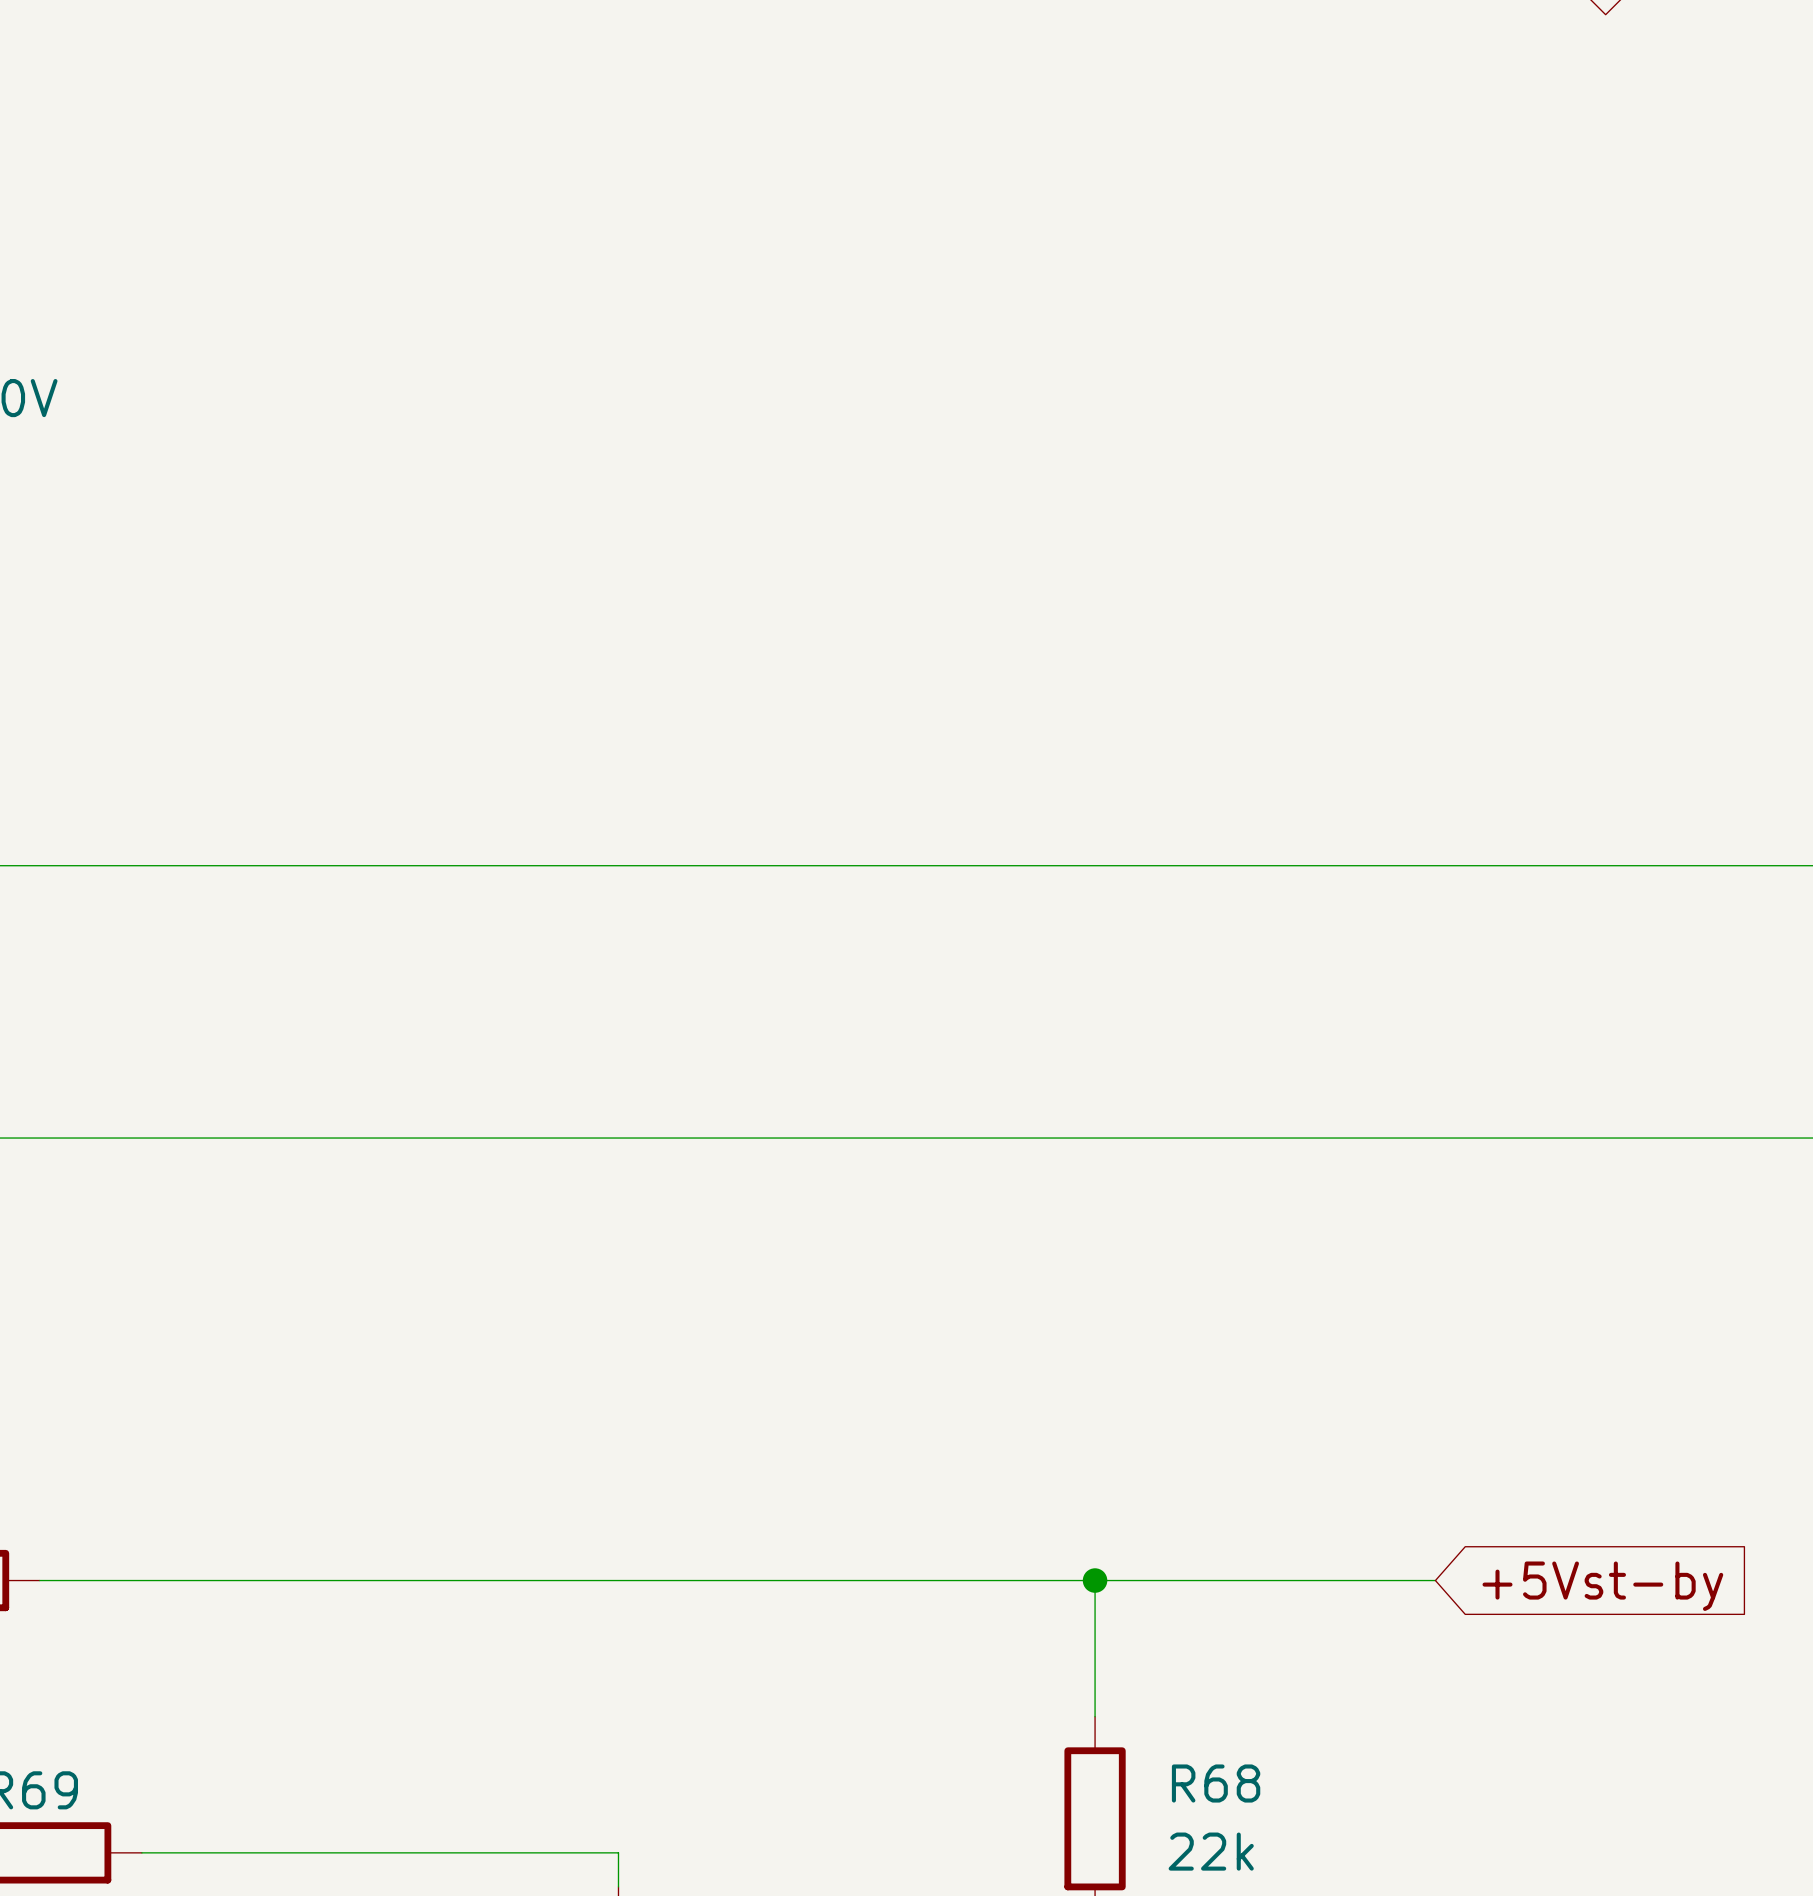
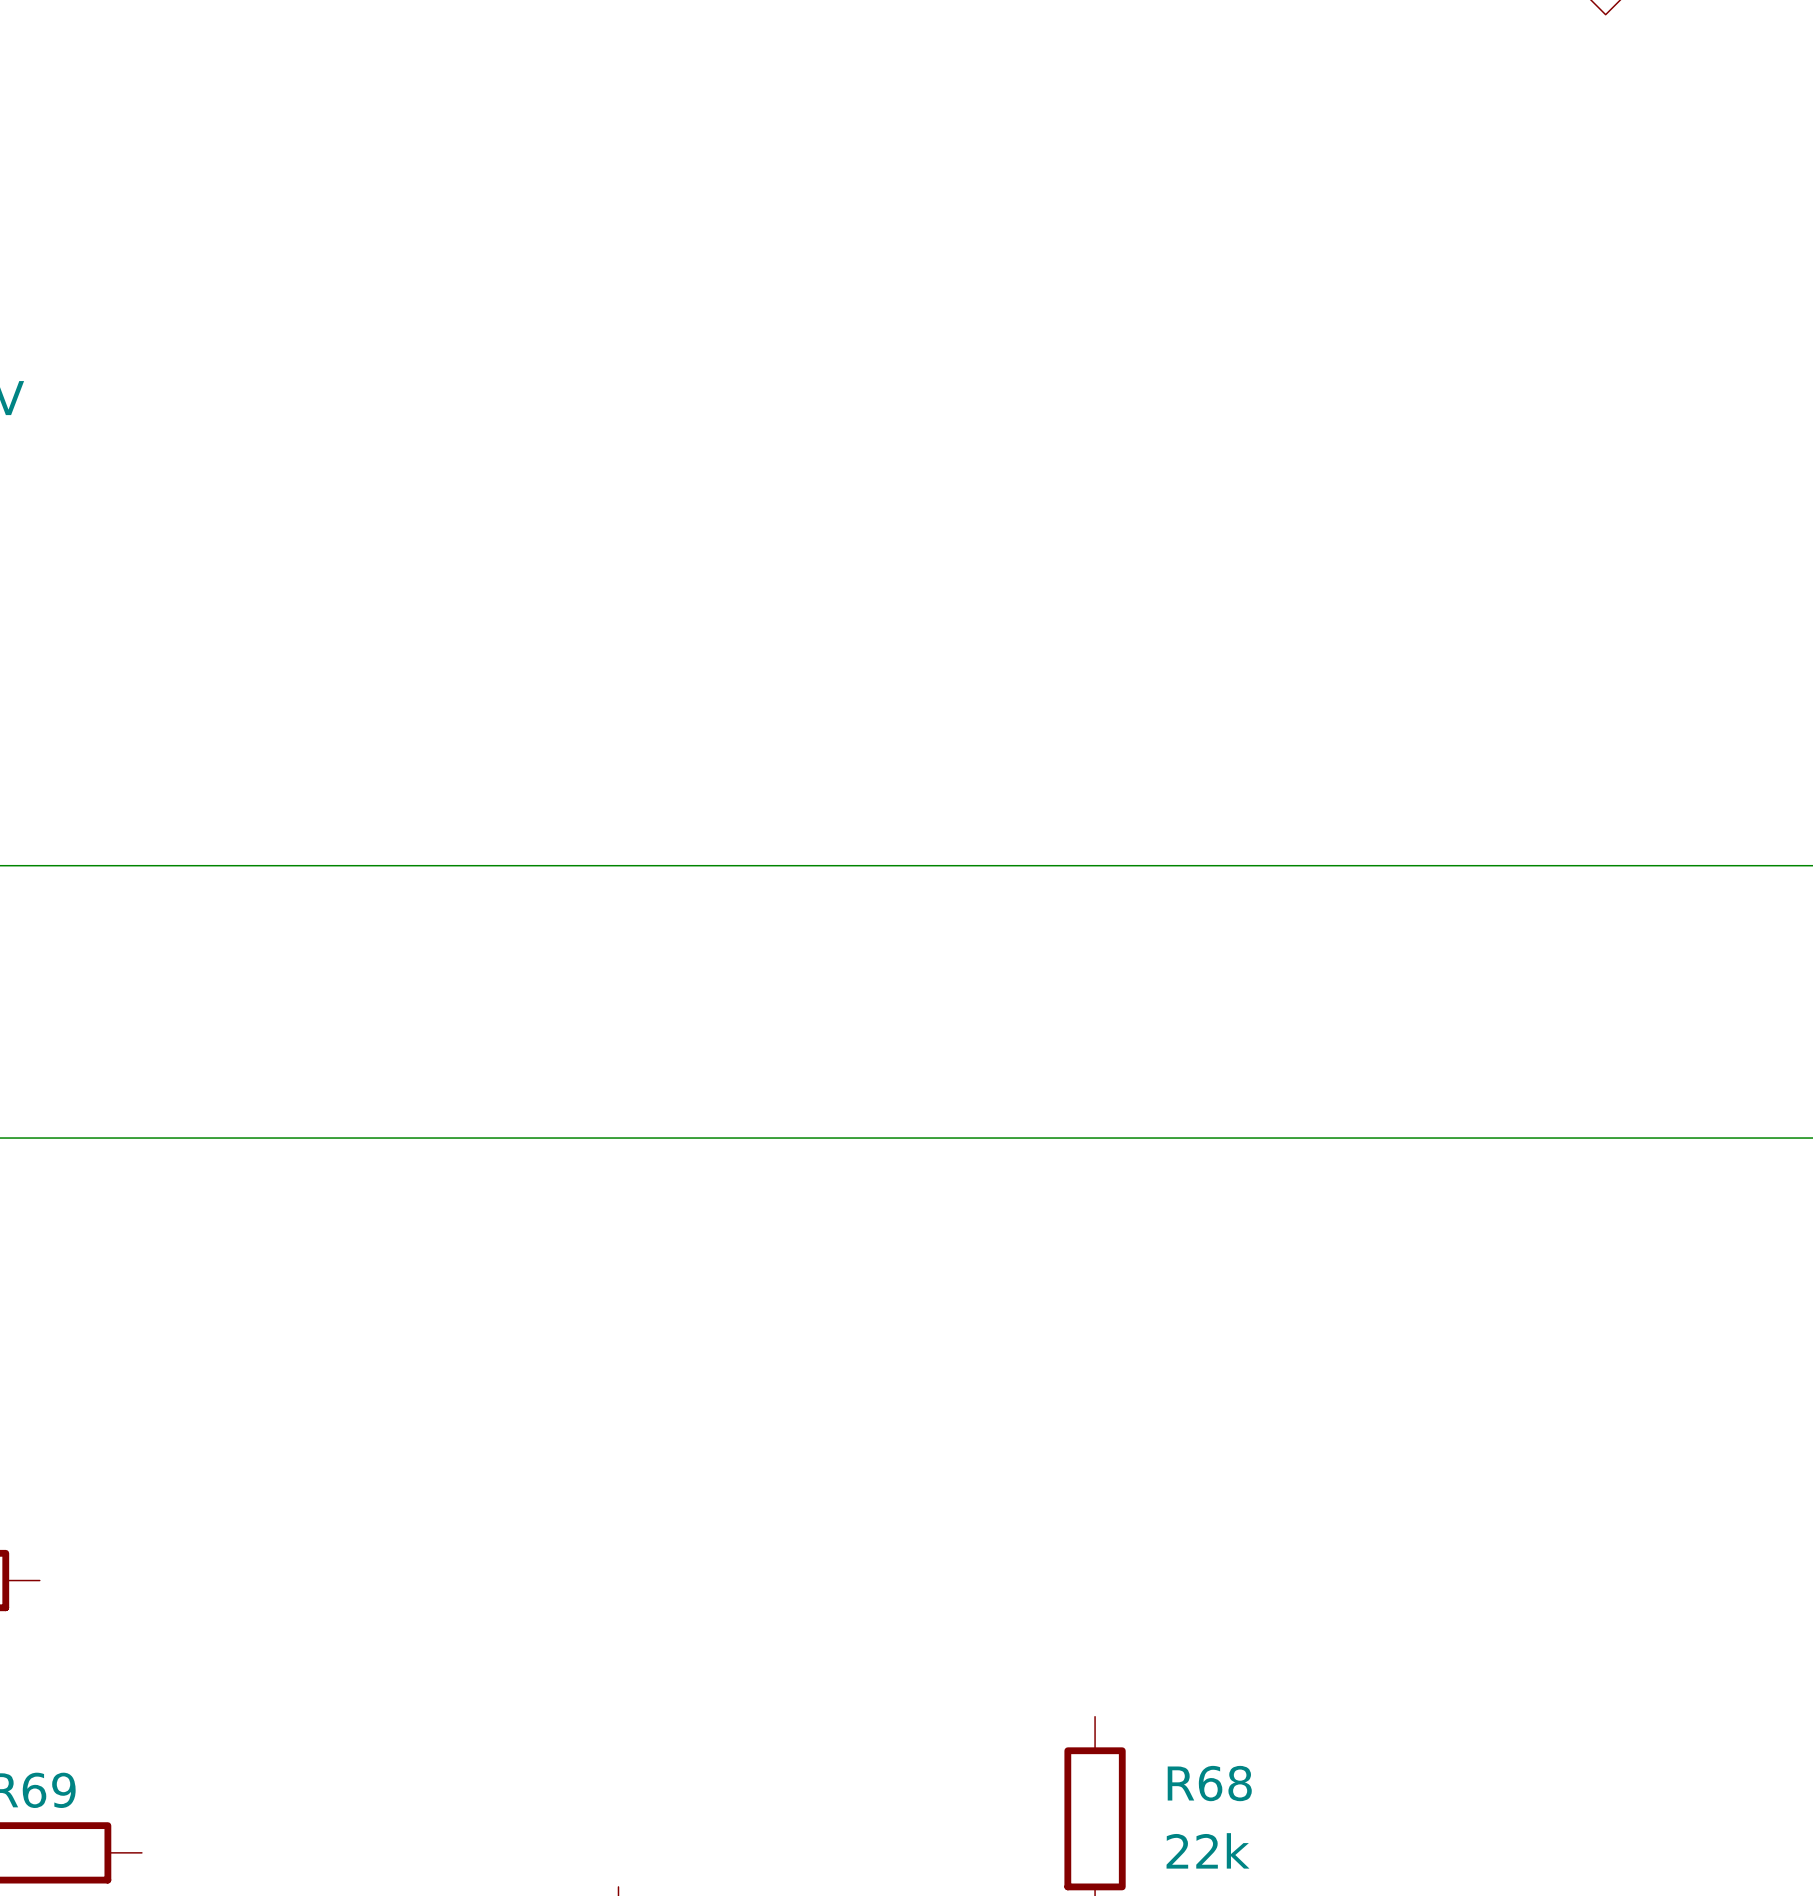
wire: (39, 1580) (1435, 1580) -> none
wire: (1095, 1580) (1095, 1716) -> none
junction: (1095, 1580) -> none
global label: +5Vst-by (1602, 1586) -> none
wire: (141, 1852) (618, 1852) (618, 1886) -> none

